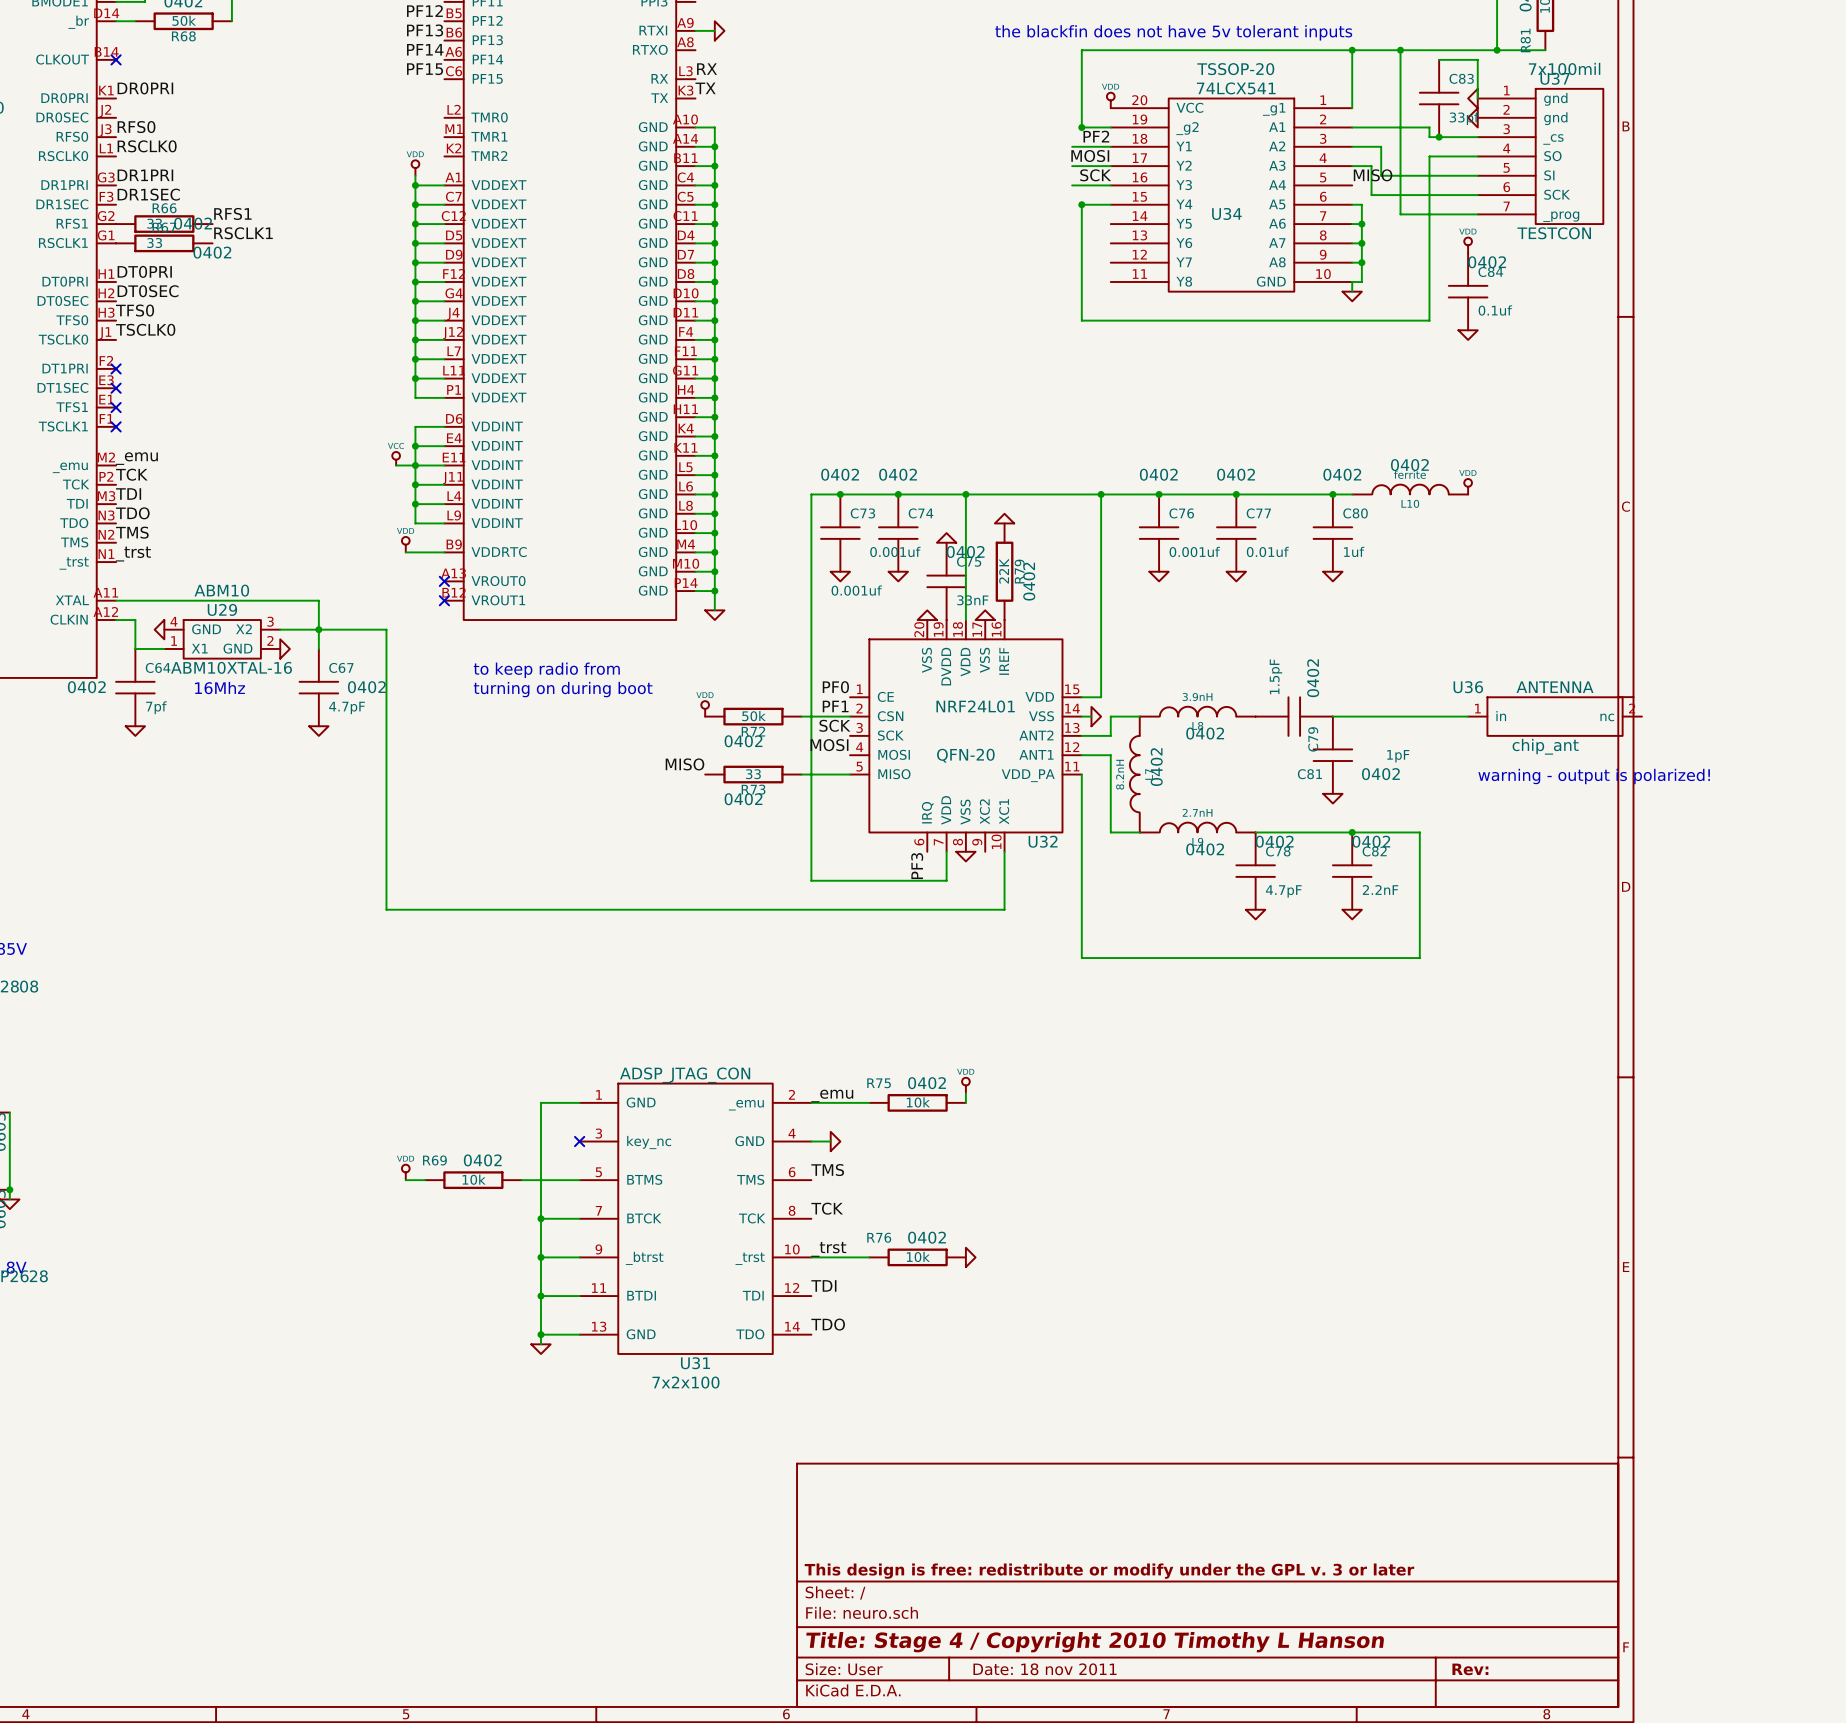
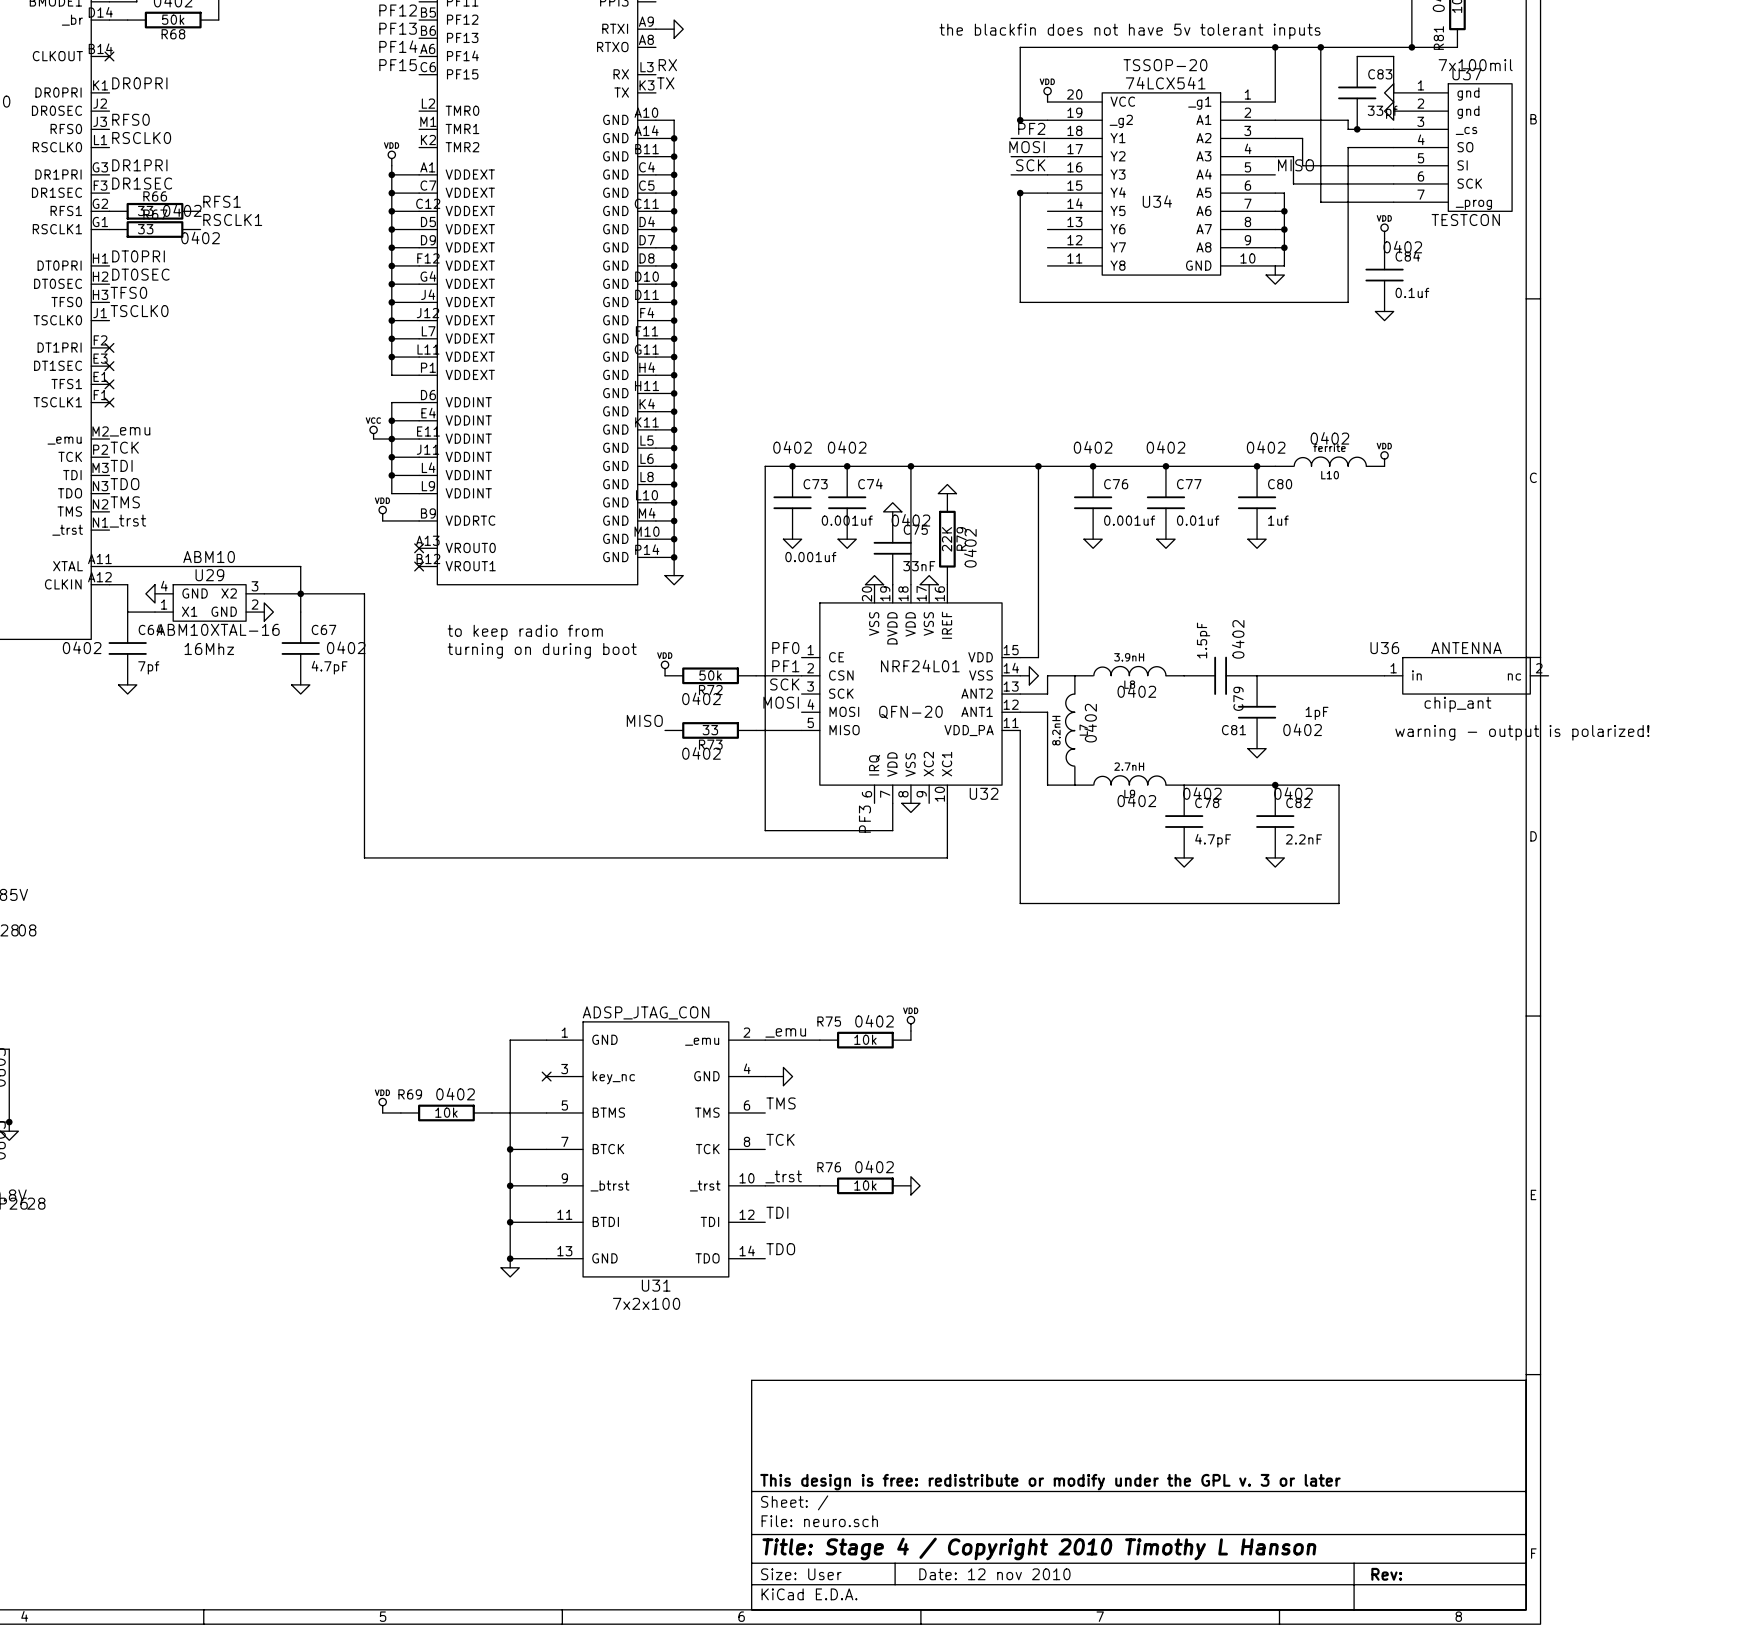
title block: Date: 18 nov 2011 (1045, 1669) -> Date: 12 nov 2010 (994, 1574)

